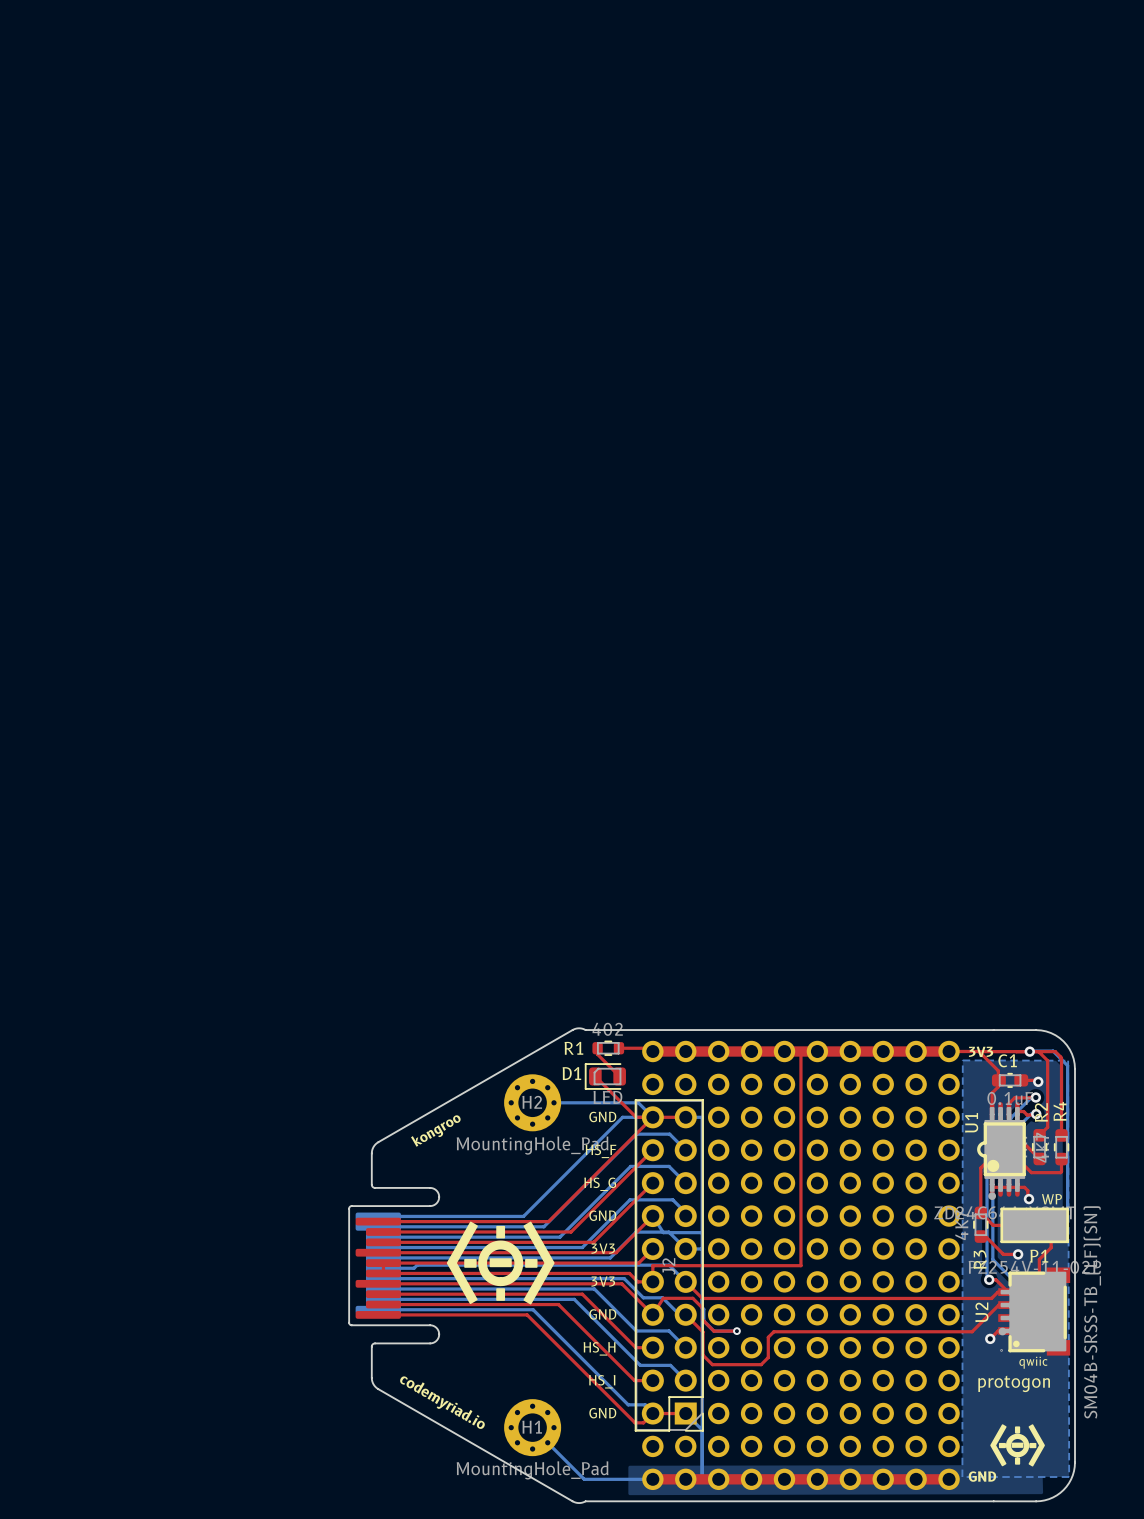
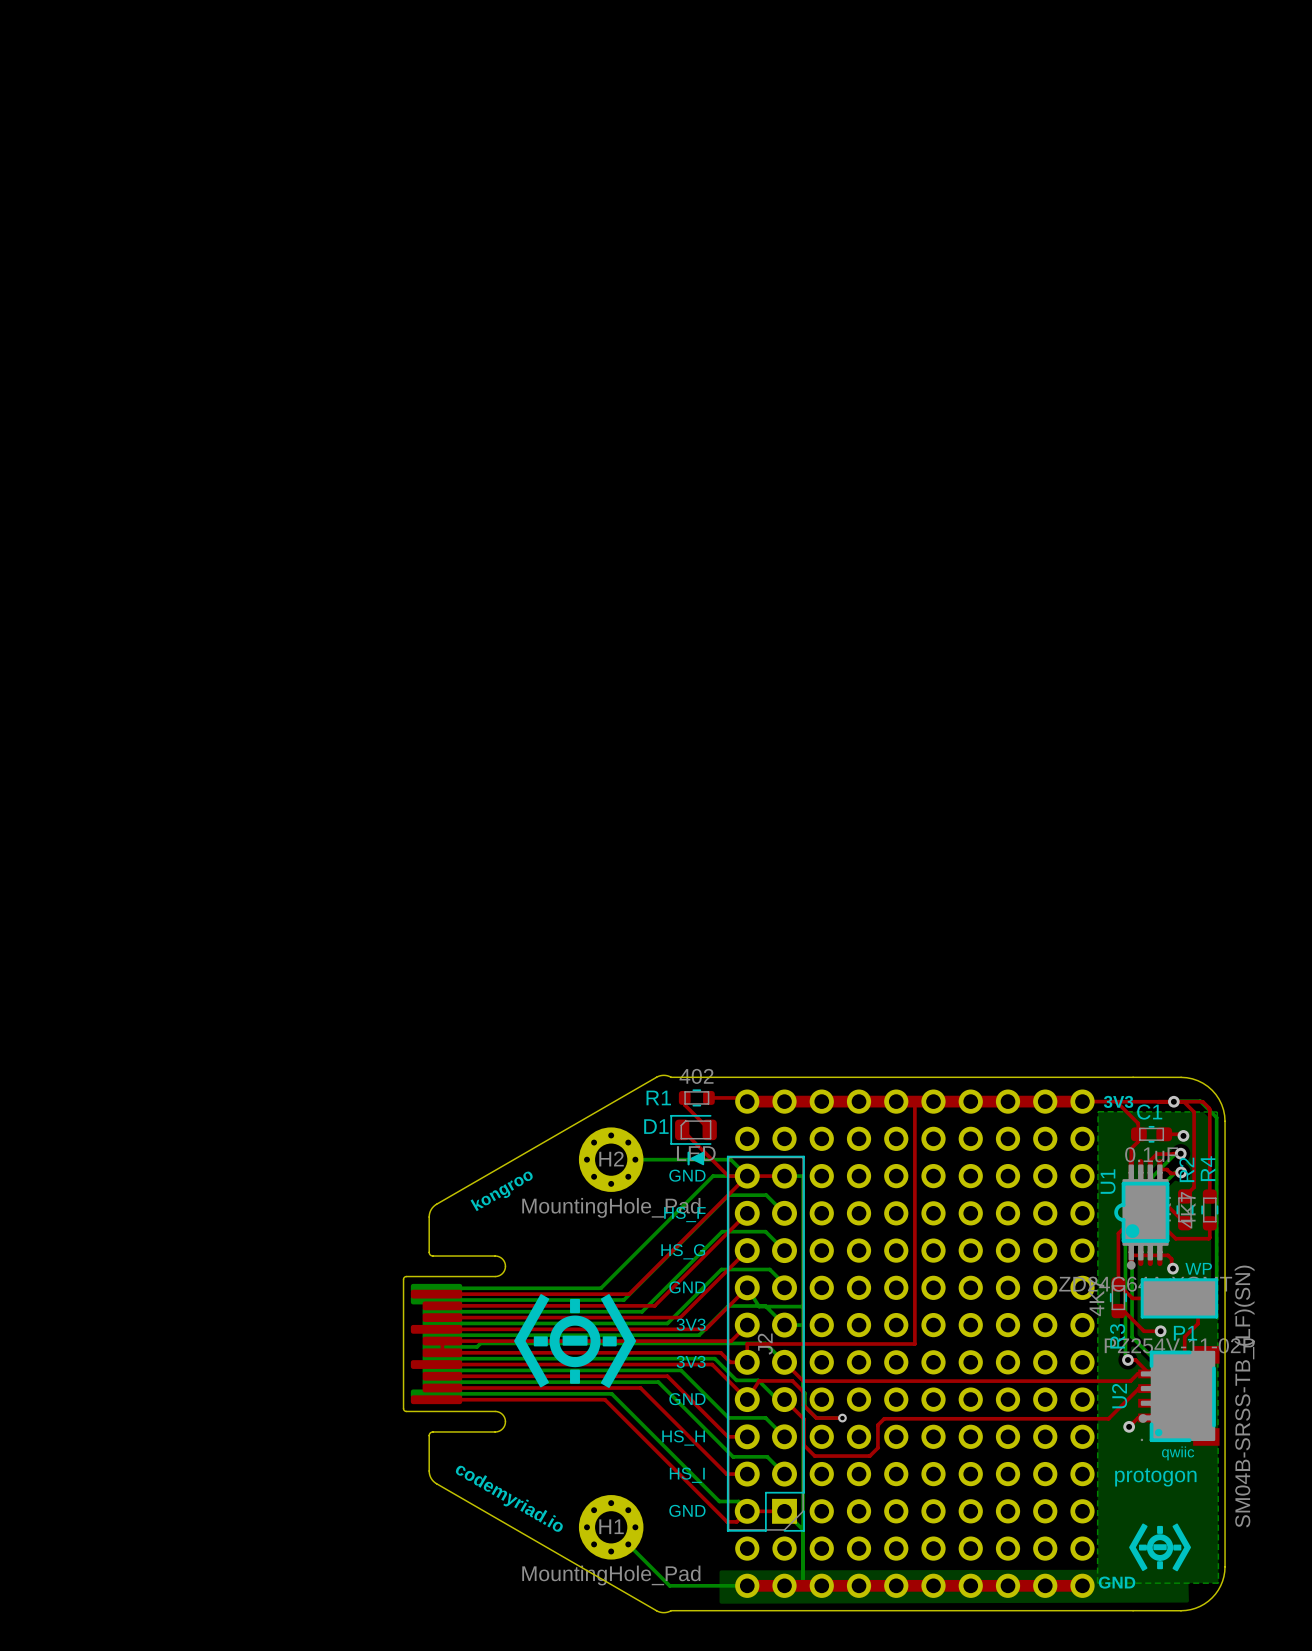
D1 footprint: [584, 1063, 626, 1090] -> [670, 1114, 717, 1166]

